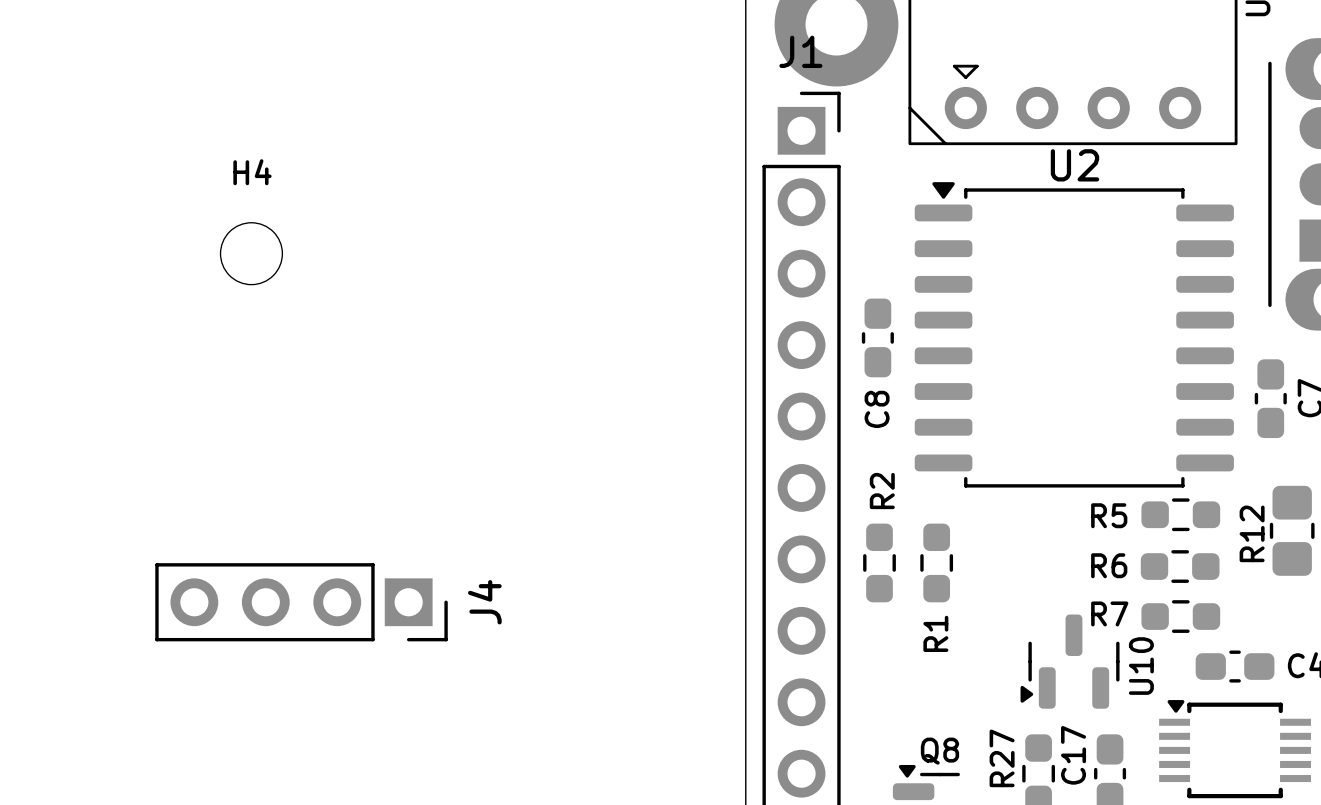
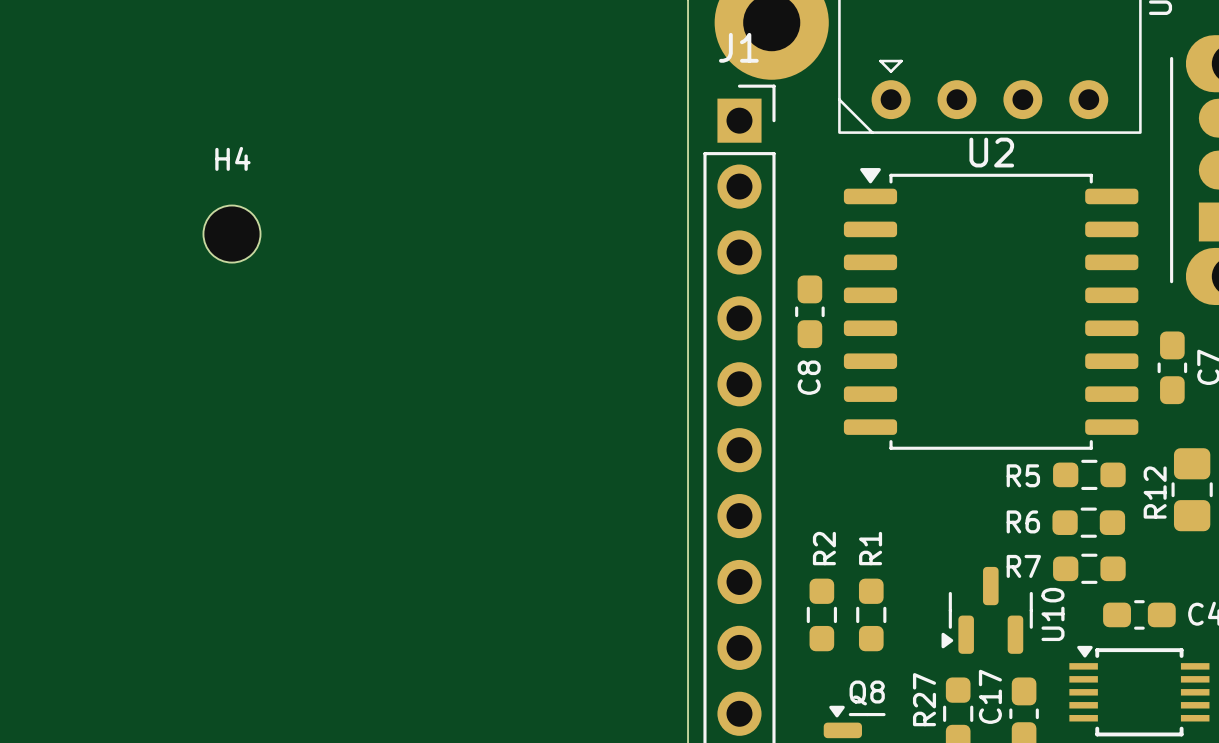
R2 position: (879, 562) -> (821, 614)
R1 position: (936, 562) -> (871, 614)
J4: (301, 602) -> none
R1 name position: R1 (935, 633) -> R1 (870, 548)

